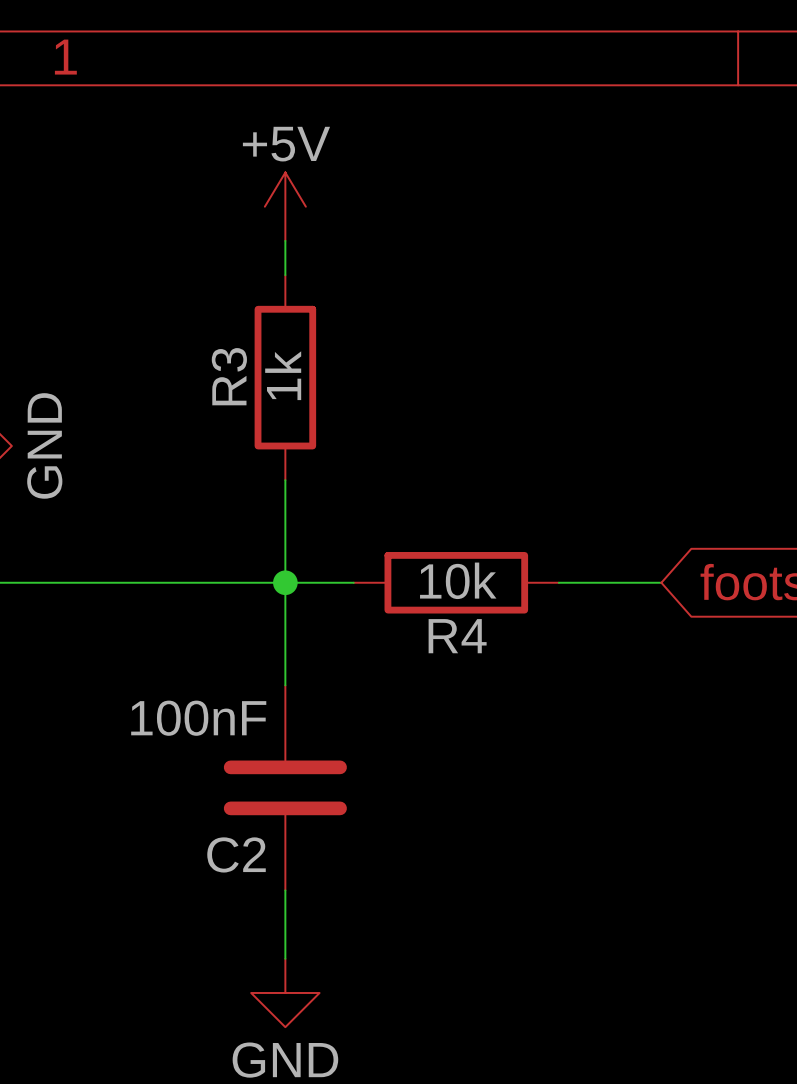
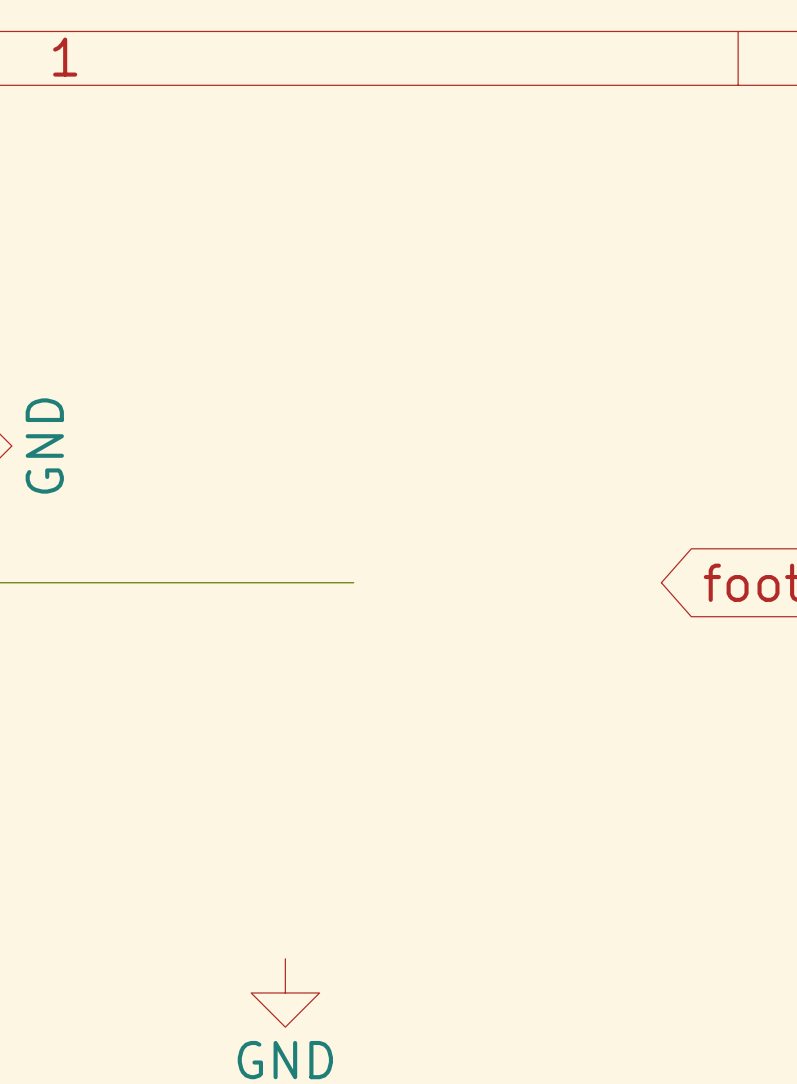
power symbol: +5V (285, 206) -> none
wire: (285, 240) (285, 275) -> none
R3: 1k (285, 377) -> none
wire: (285, 480) (285, 685) -> none
junction: (285, 582) -> none
R4: 10k (456, 582) -> none
wire: (558, 582) (661, 582) -> none
C2: 100nF (285, 787) -> none
wire: (285, 890) (285, 958) -> none

